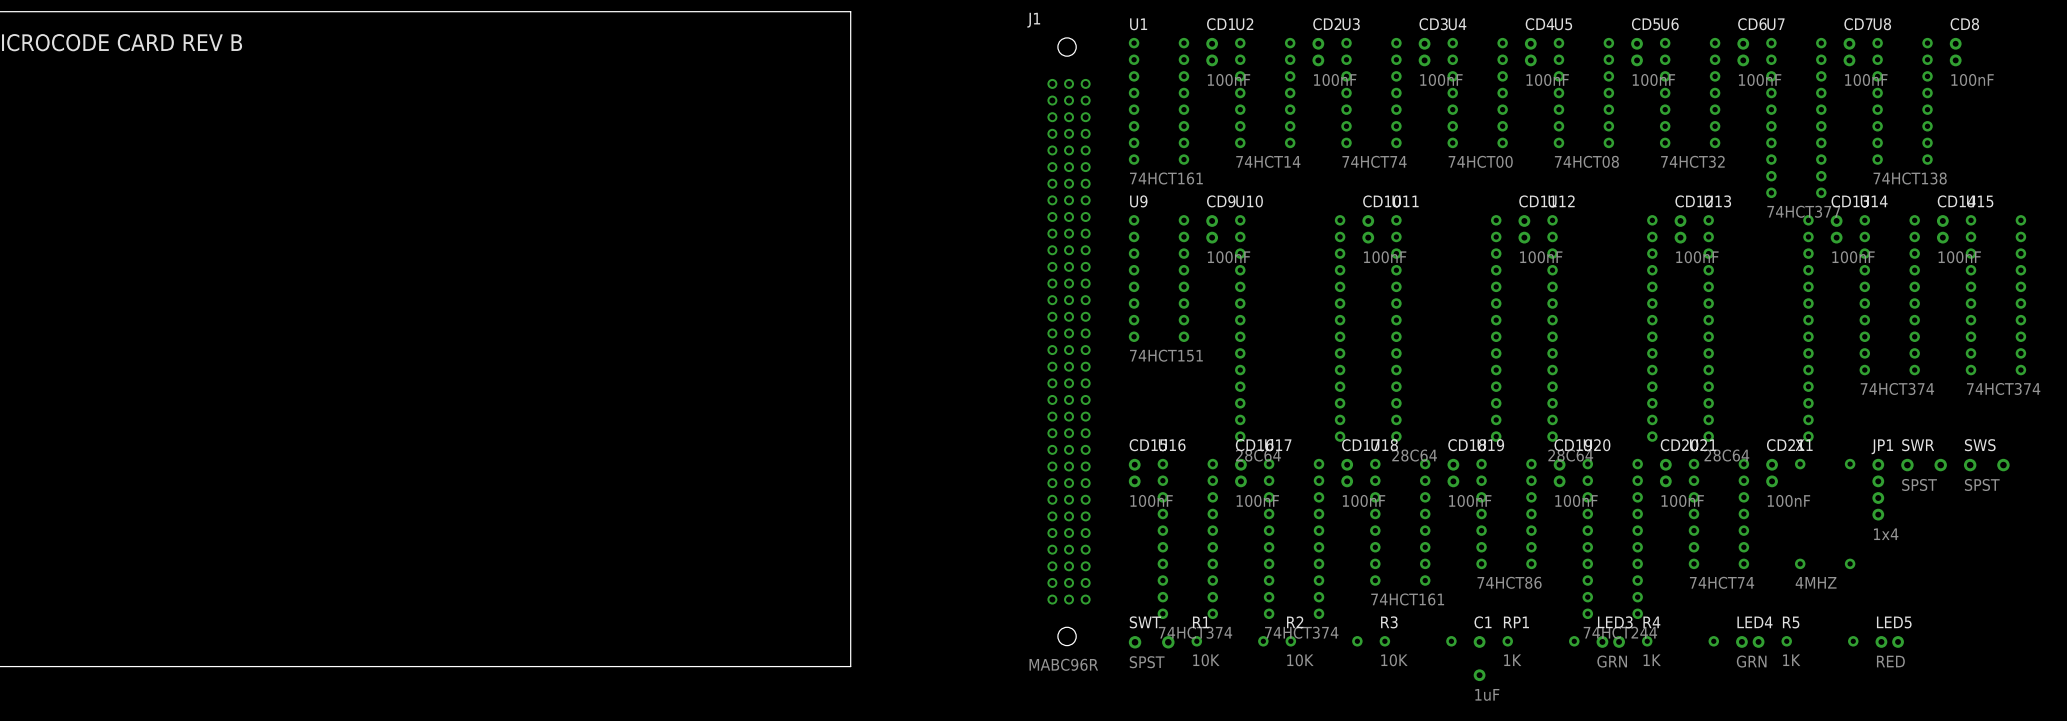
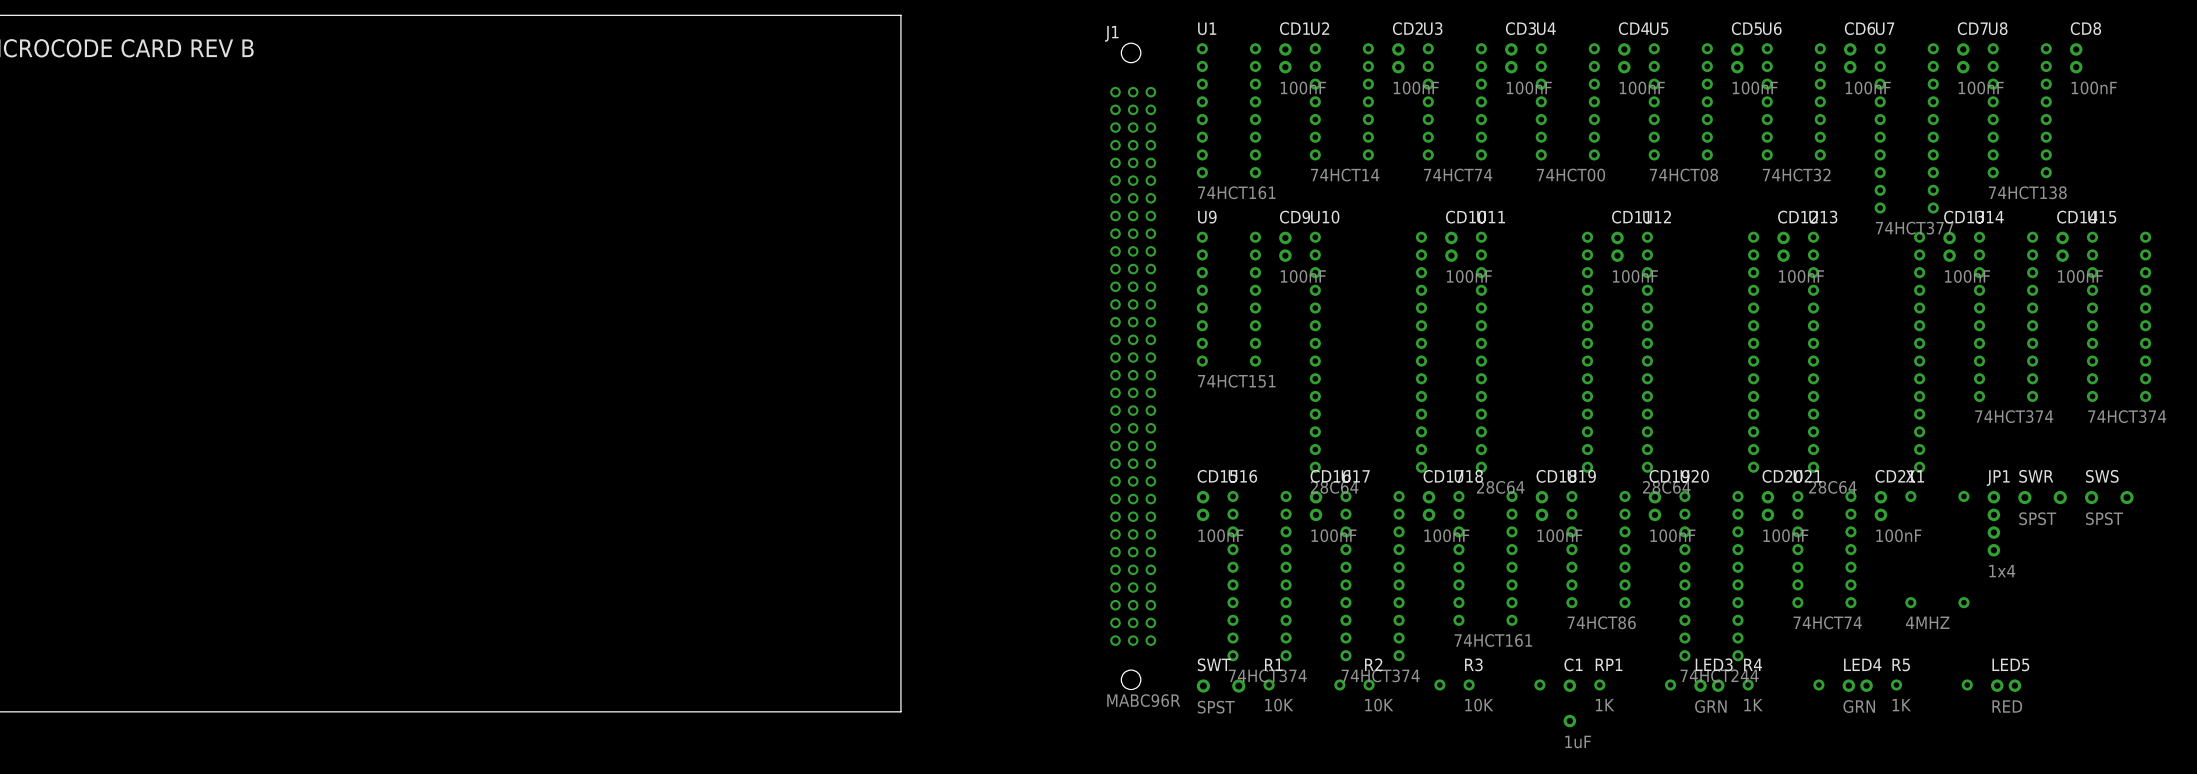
J1 name position: J1 (1033, 20) -> J1 (1111, 33)
J1 value position: MABC96R (1063, 664) -> MABC96R (1143, 700)

